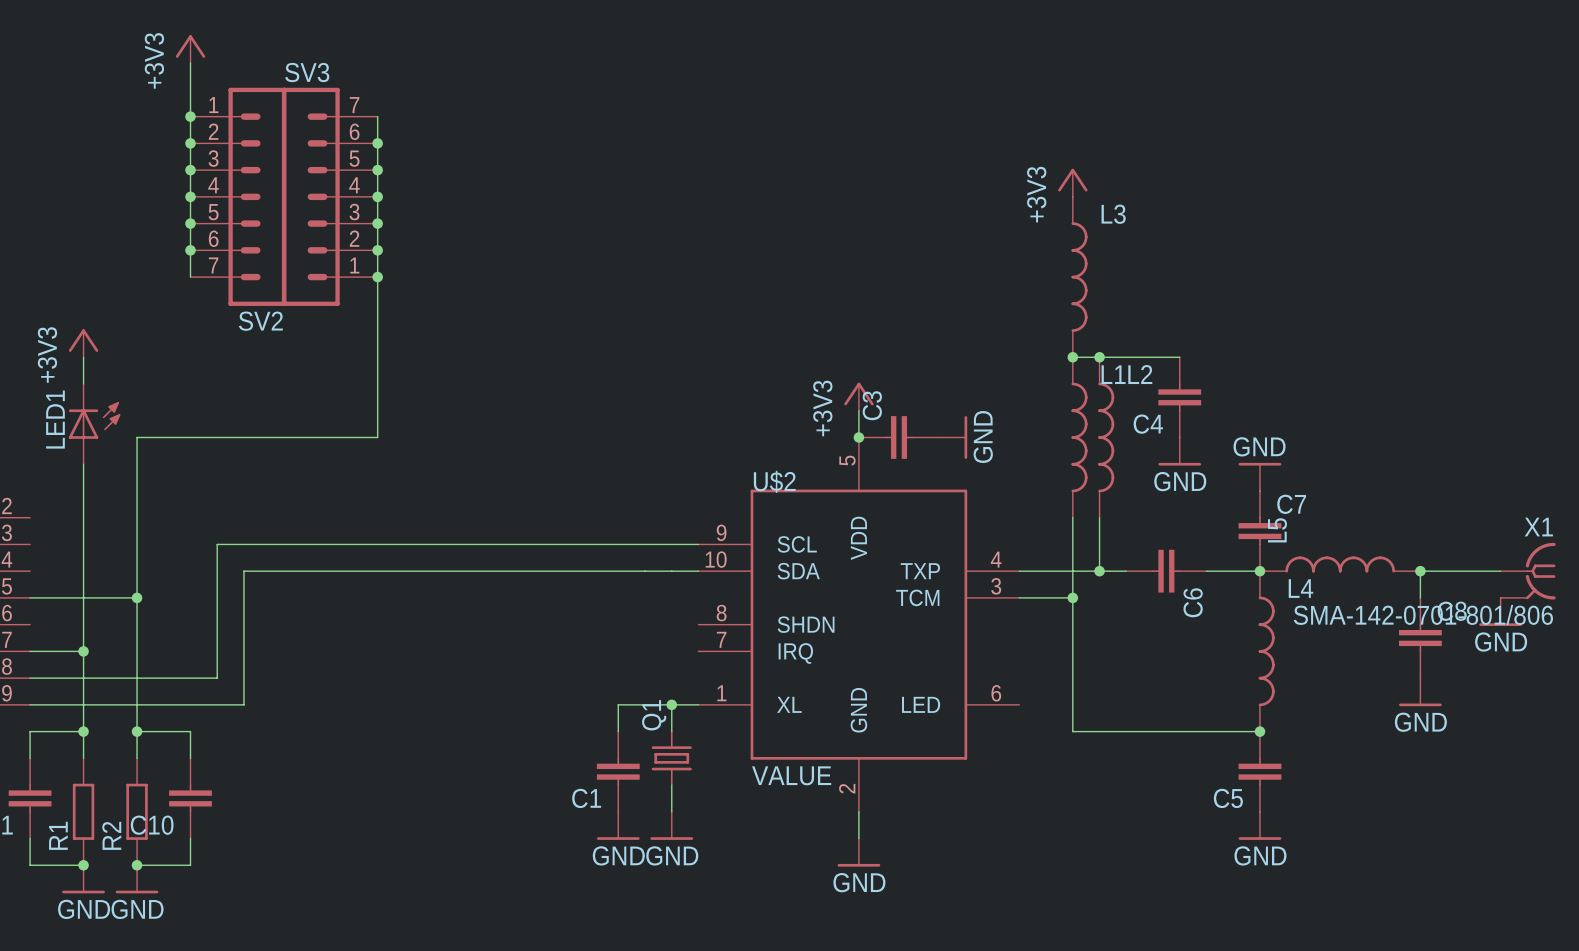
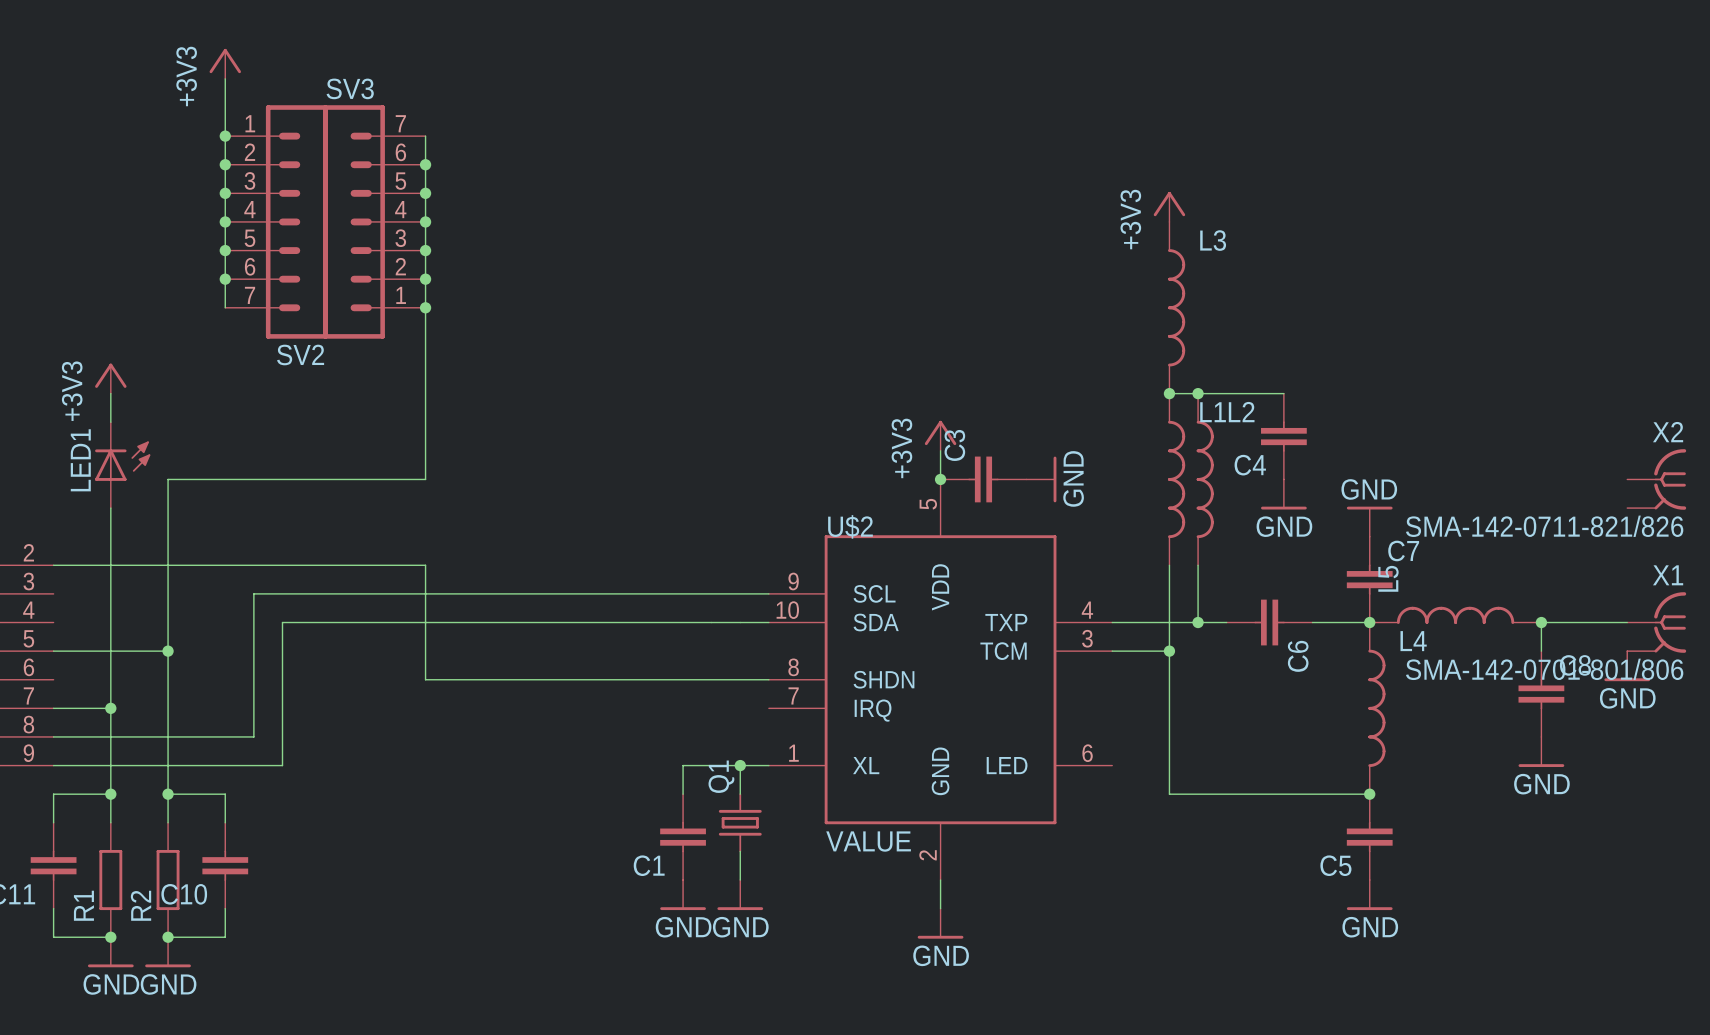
X2: none -> SMA-142-0711-821/826 (1656, 479)
wire: none -> (53, 565) (425, 565) (425, 679) (768, 679)

